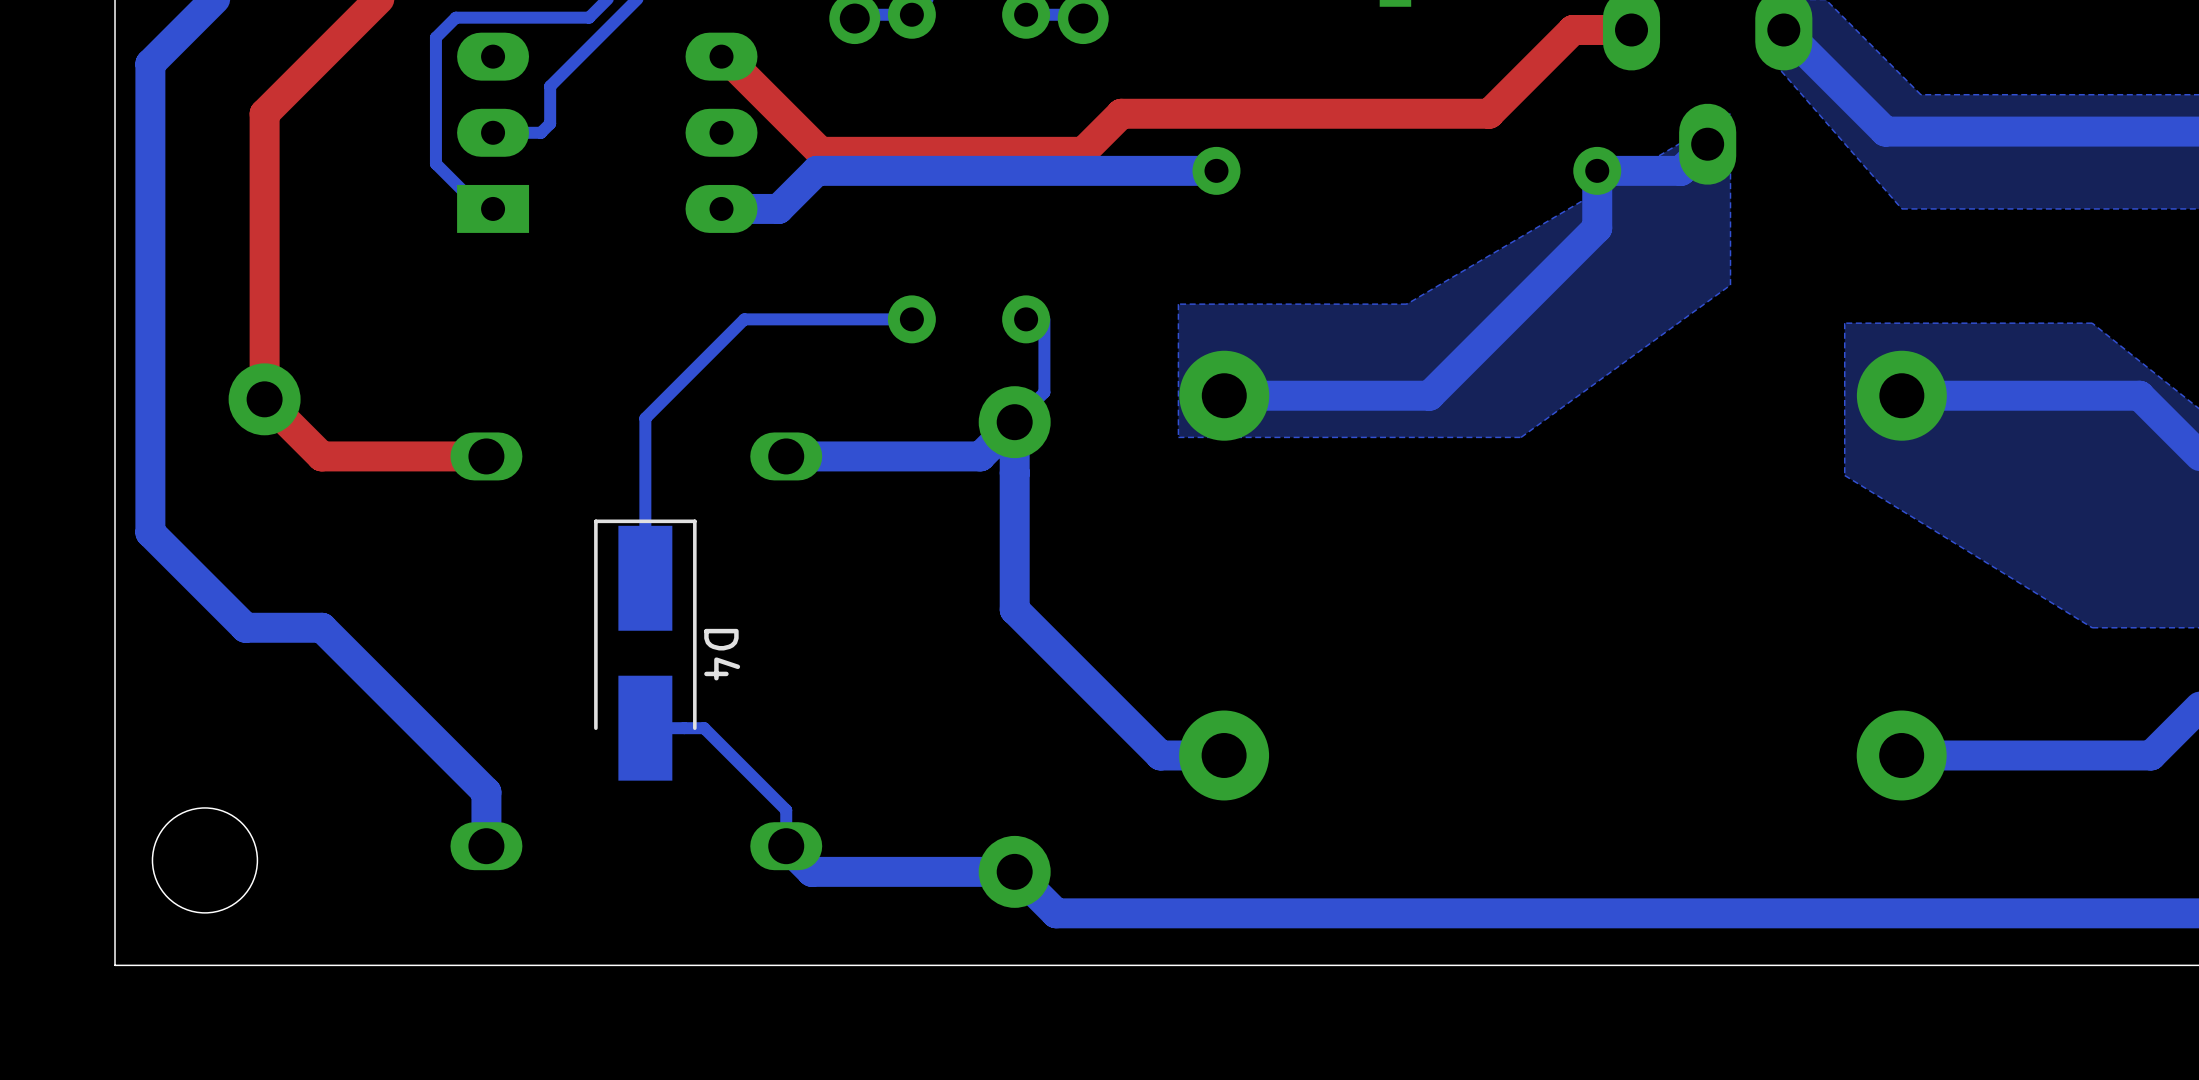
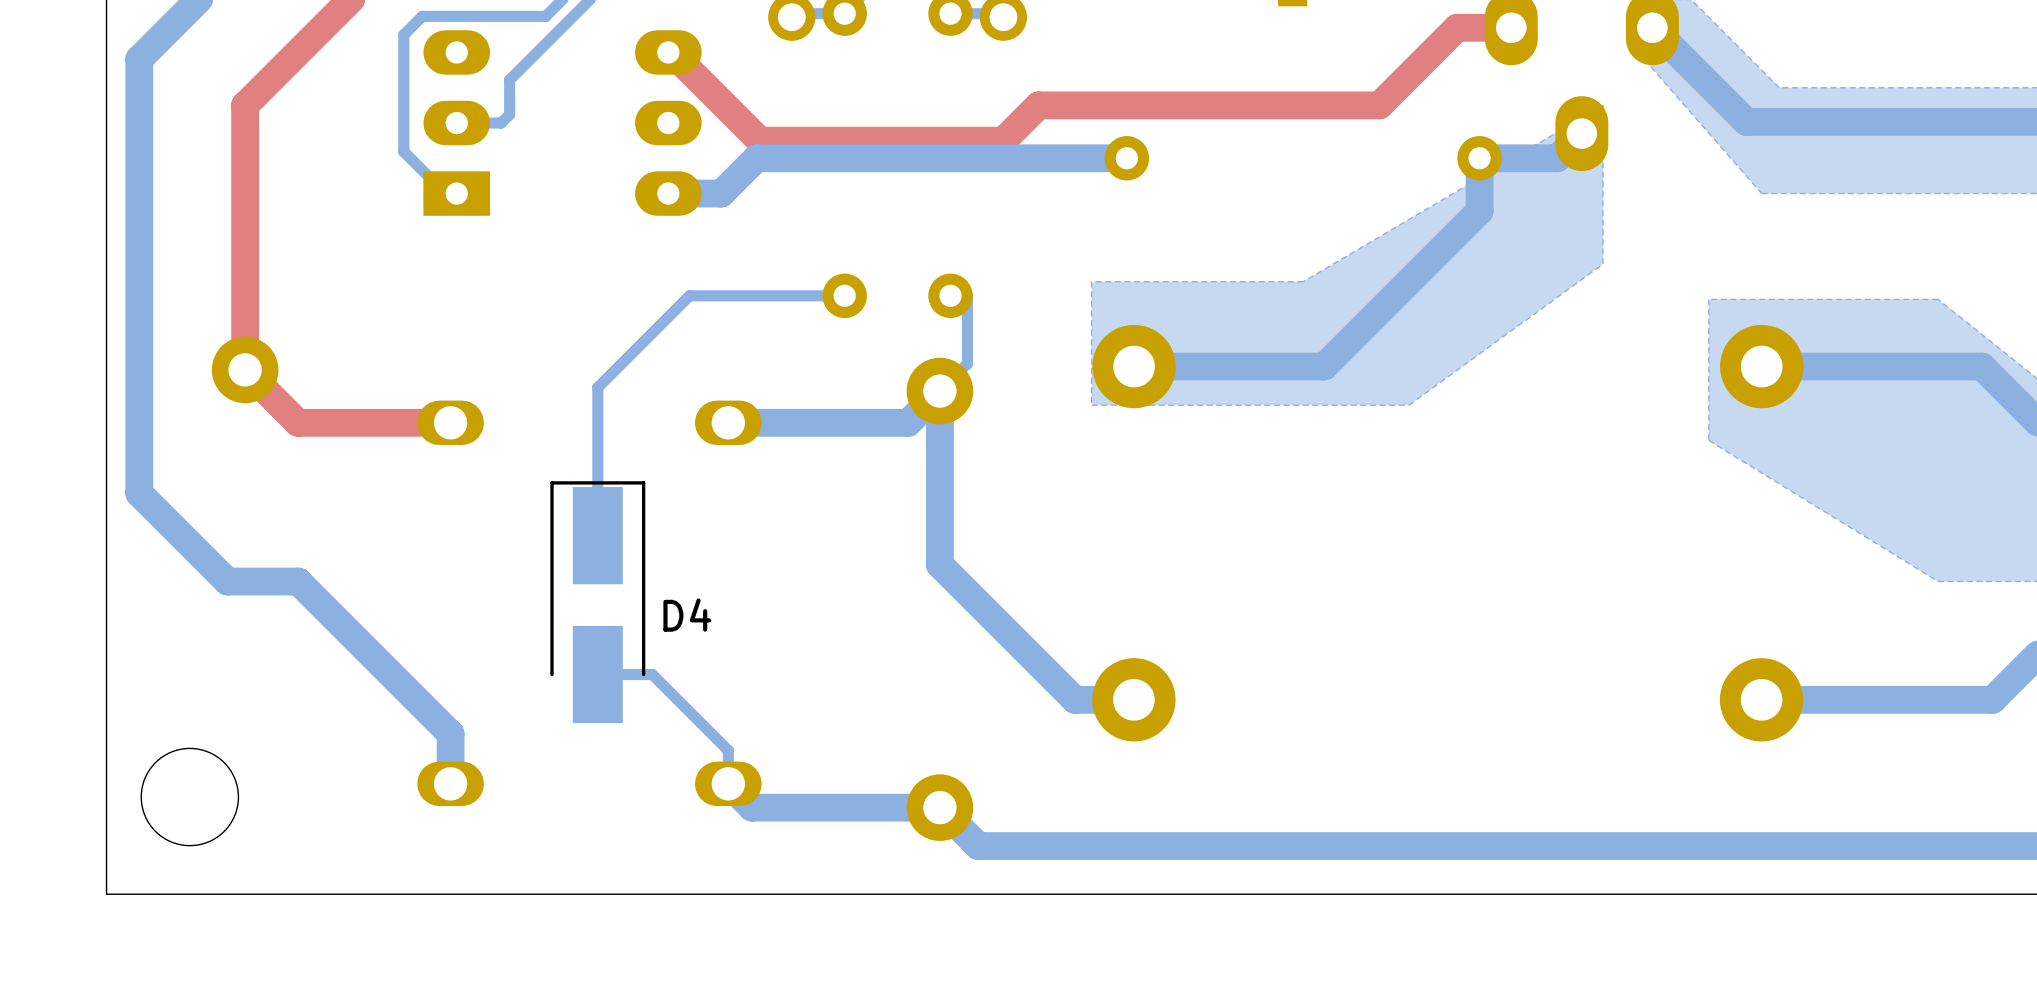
D4 name rotation: 0° (722, 654) -> 90° counterclockwise (687, 615)

